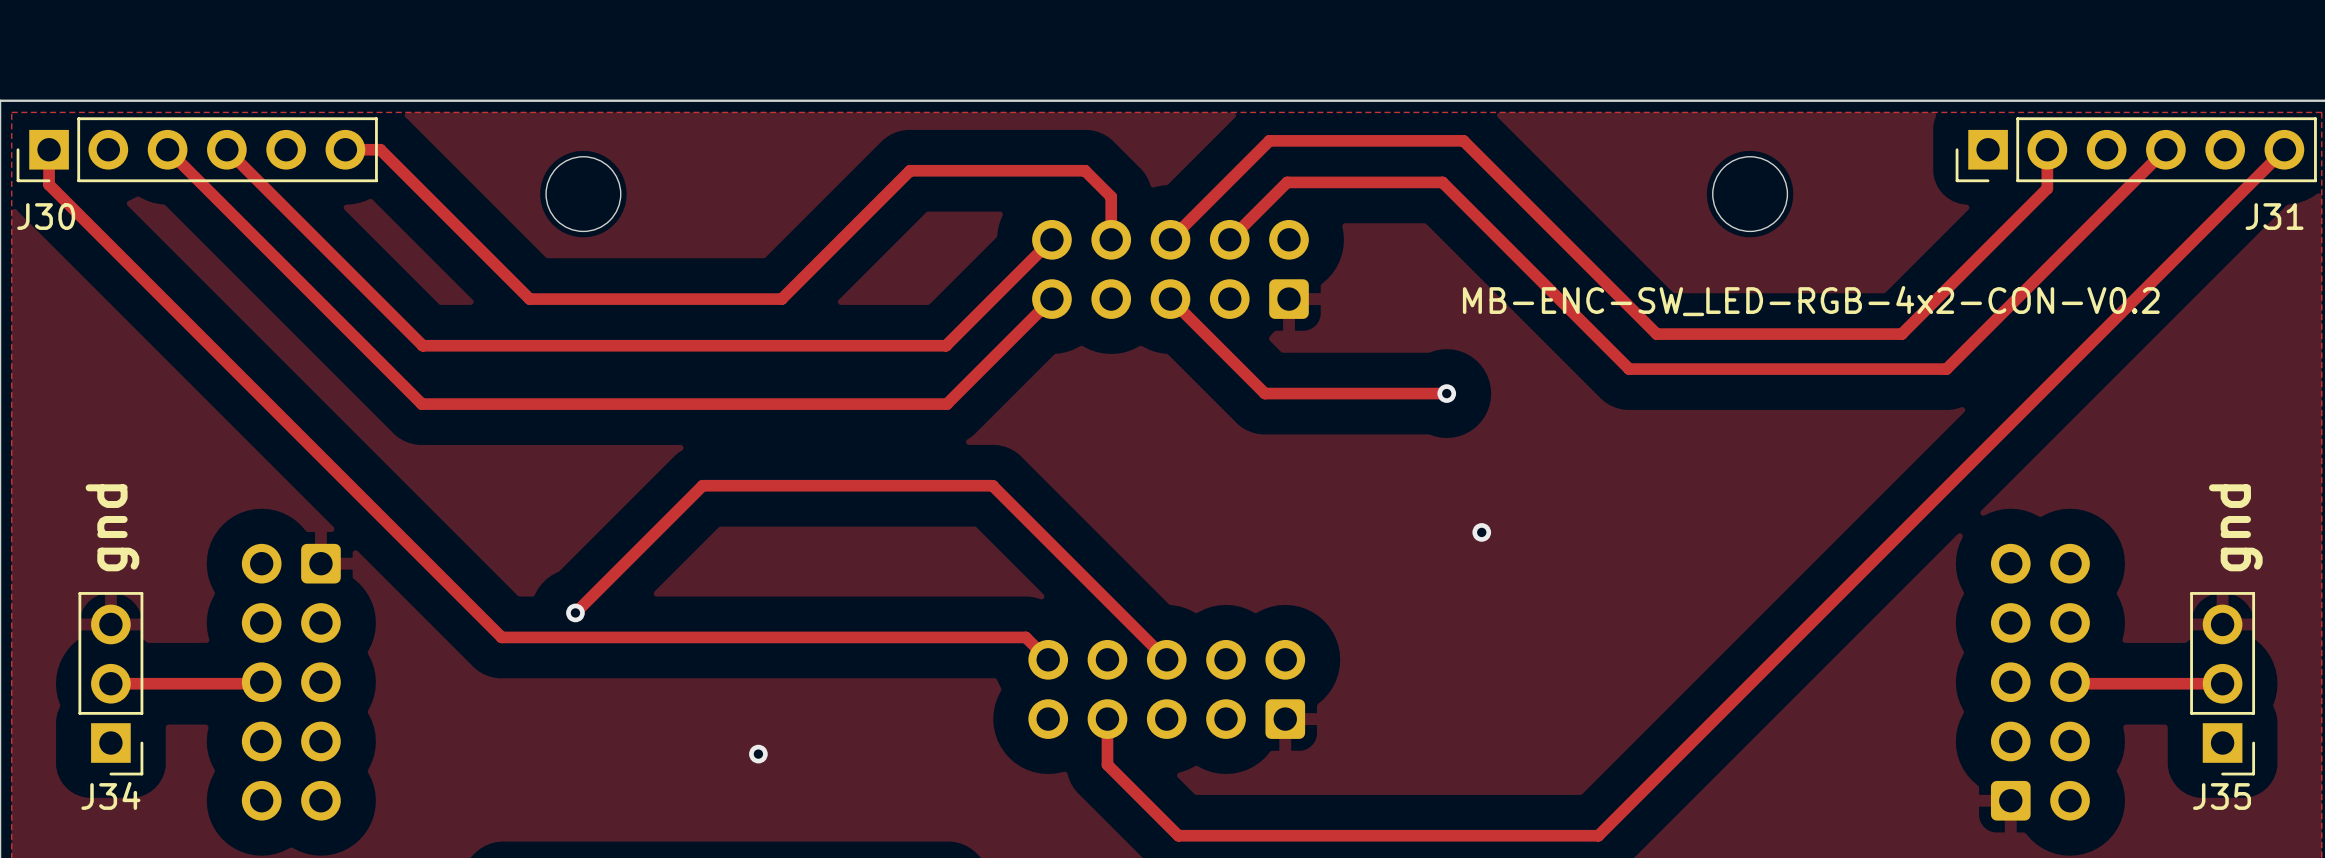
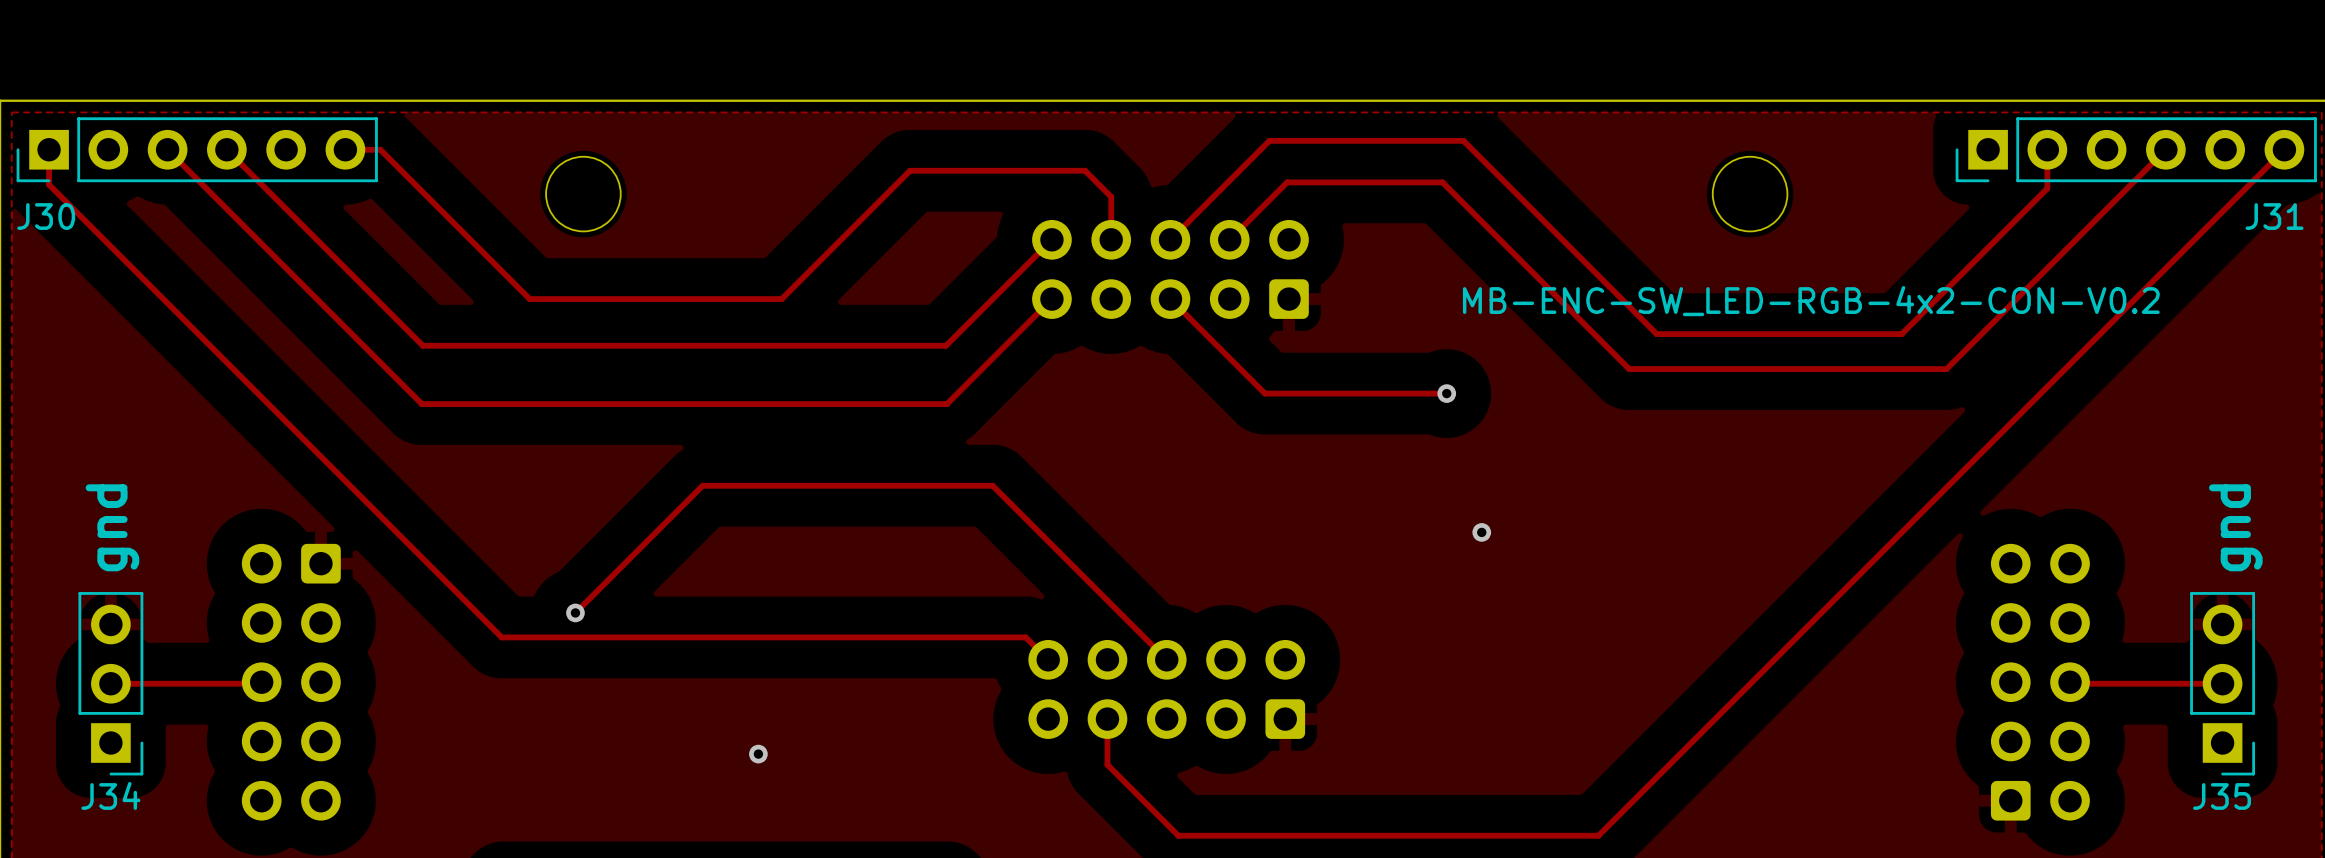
track width: thick (49, 149) (49, 184) (501, 637) (1025, 637) (1048, 659) -> thin (49, 149) (49, 184) (501, 637) (1025, 637) (1048, 659)
track width: thick (167, 149) (421, 404) (946, 404) (1051, 299) -> thin (167, 149) (421, 404) (946, 404) (1051, 299)
track width: thick (226, 149) (422, 345) (946, 345) (1051, 239) -> thin (226, 149) (422, 345) (946, 345) (1051, 239)
track width: thick (345, 149) (380, 149) (529, 299) (781, 299) (910, 170) (1085, 170) (1111, 196) (1111, 239) -> thin (345, 149) (380, 149) (529, 299) (781, 299) (910, 170) (1085, 170) (1111, 196) (1111, 239)
track width: thick (2047, 149) (2047, 188) (1901, 334) (1656, 334) (1463, 140) (1269, 140) (1170, 239) -> thin (2047, 149) (2047, 188) (1901, 334) (1656, 334) (1463, 140) (1269, 140) (1170, 239)
track width: thick (2165, 149) (1946, 369) (1629, 369) (1442, 182) (1287, 182) (1229, 239) -> thin (2165, 149) (1946, 369) (1629, 369) (1442, 182) (1287, 182) (1229, 239)
track width: thick (2284, 149) (1598, 835) (1178, 835) (1107, 764) (1107, 719) -> thin (2284, 149) (1598, 835) (1178, 835) (1107, 764) (1107, 719)
track width: thick (1170, 299) (1264, 393) (1446, 393) -> thin (1170, 299) (1264, 393) (1446, 393)
track width: thick (575, 612) (702, 485) (992, 485) (1166, 659) -> thin (575, 612) (702, 485) (992, 485) (1166, 659)
track width: thick (261, 682) (260, 683) (110, 683) -> thin (261, 682) (260, 683) (110, 683)
track width: thick (2070, 682) (2071, 683) (2222, 683) -> thin (2070, 682) (2071, 683) (2222, 683)

